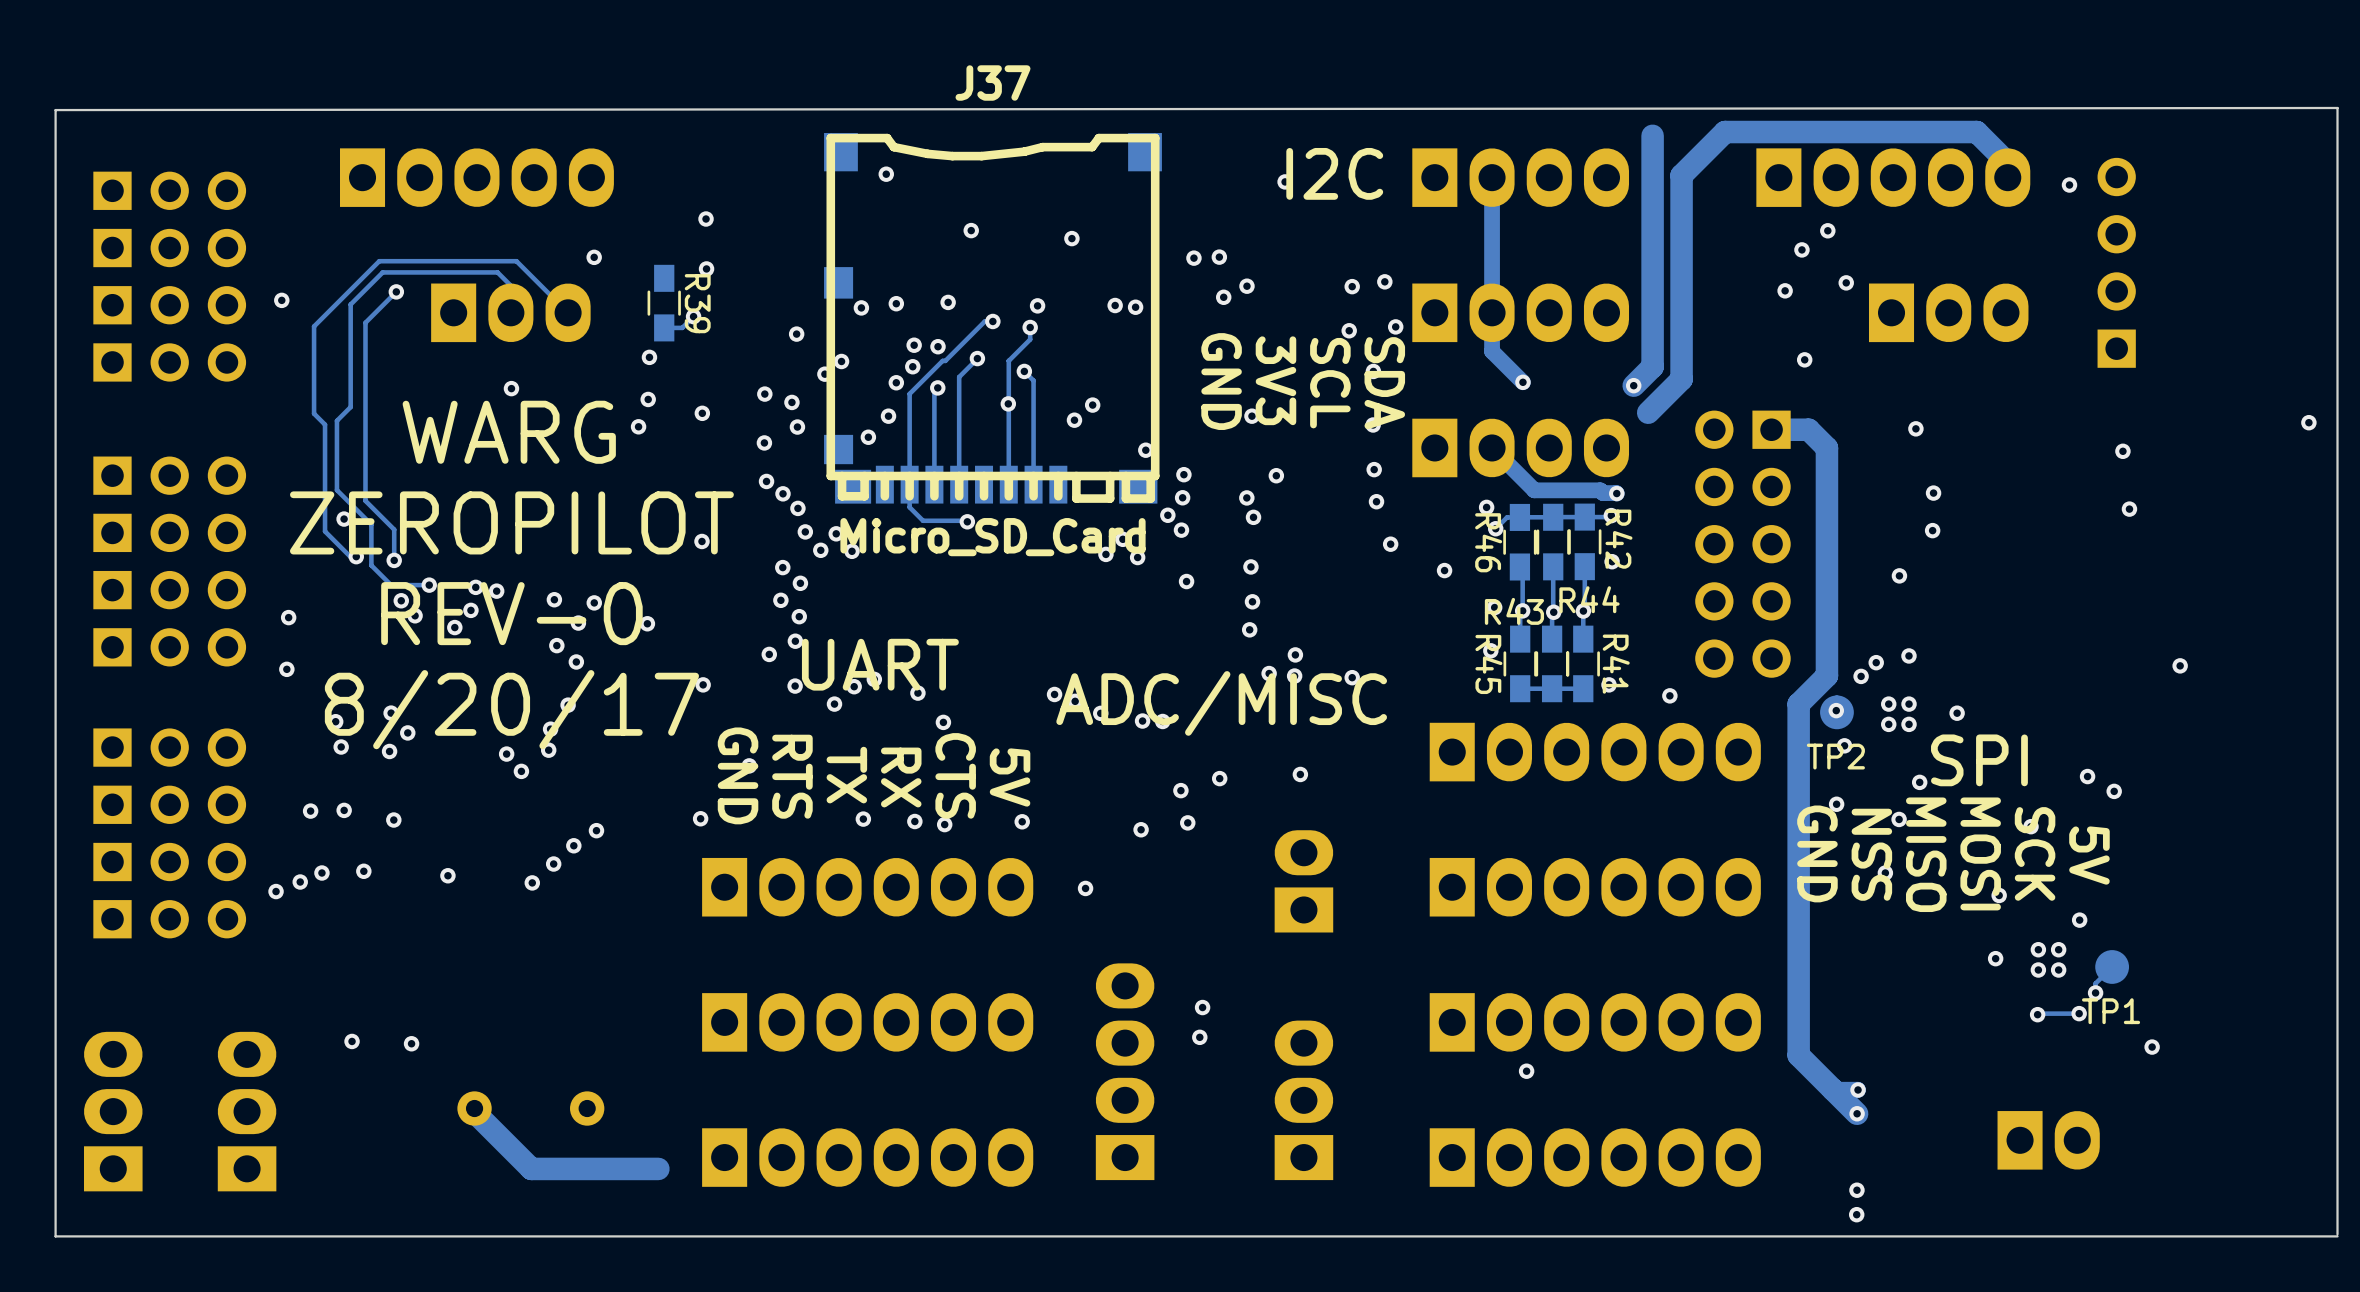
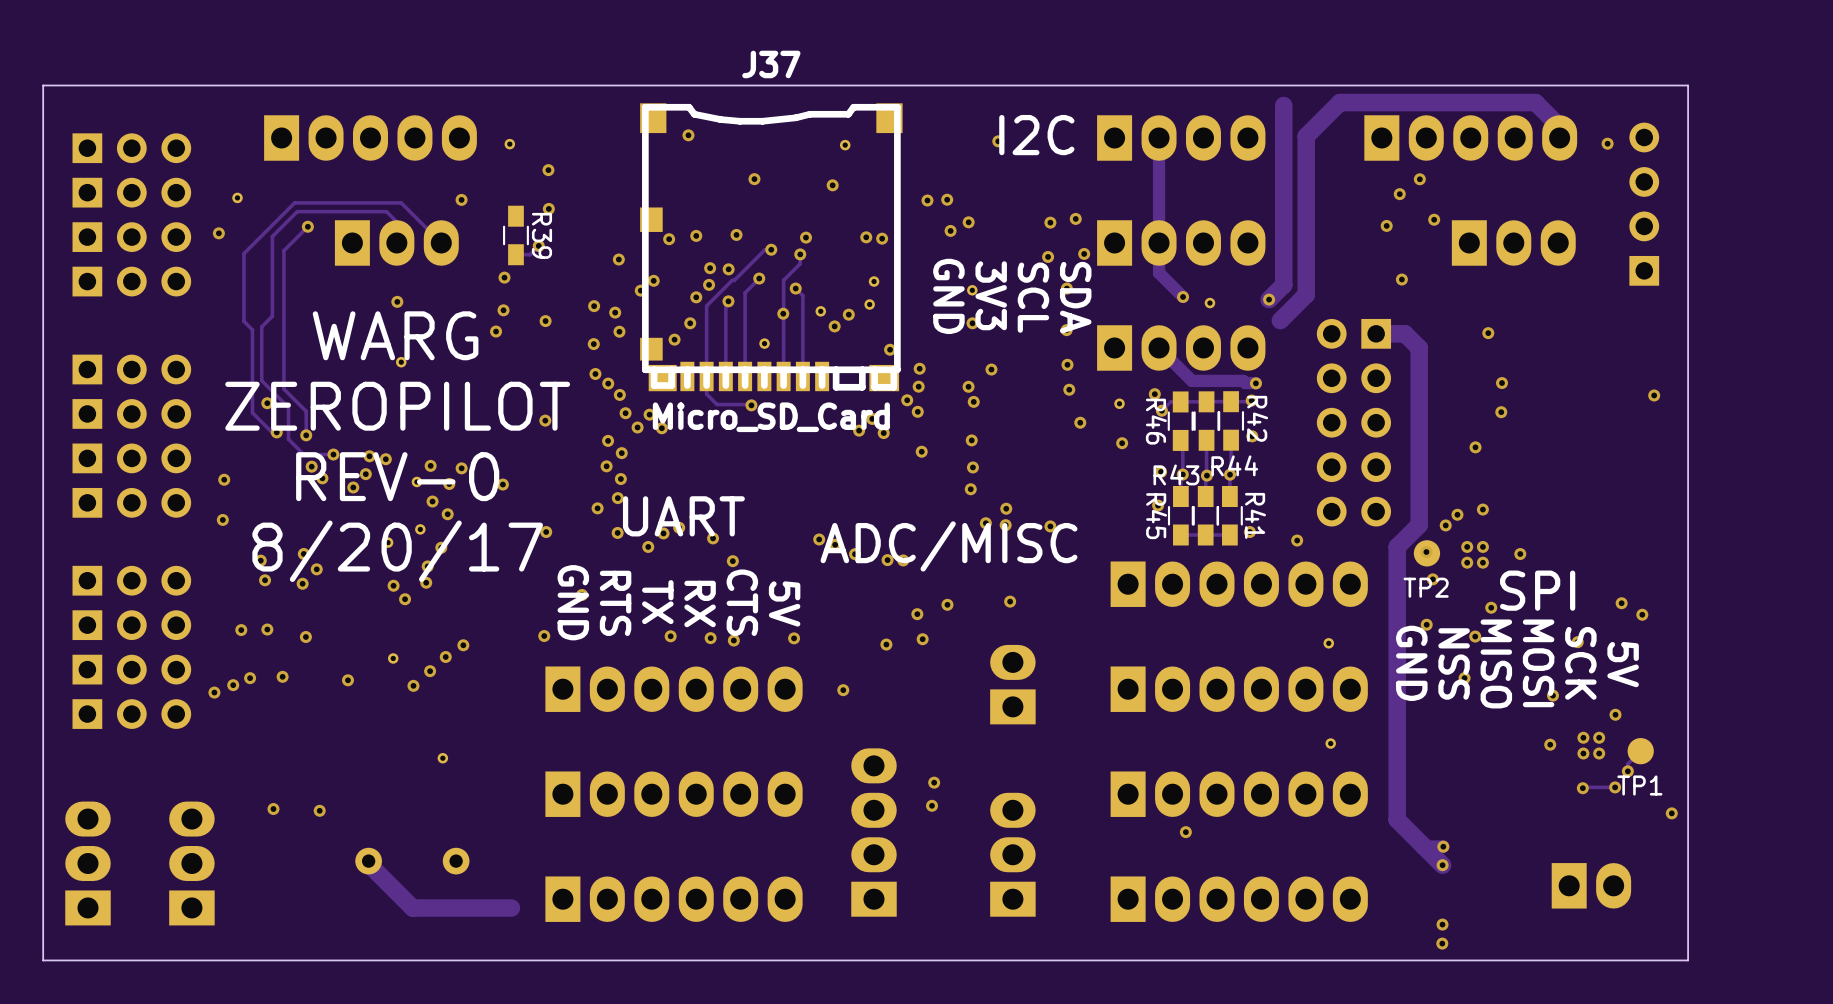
board edge: (55, 110) (2337, 107) (2337, 1234) -> (43, 85) (1688, 85) (1688, 960)
part: none -> (509, 144)
part: none -> (845, 145)
part: none -> (237, 197)
part: none -> (874, 281)
part: none -> (972, 290)
part: none -> (1209, 303)
part: none -> (869, 304)
part: none -> (820, 311)
via: (2308, 422) -> none
part: none -> (764, 343)
via: (2122, 451) -> none
part: none -> (401, 362)
part: none -> (1119, 403)
part: none -> (416, 481)
via: (2180, 665) -> none
part: none -> (420, 529)
part: none -> (388, 542)
part: none -> (1328, 643)
part: none -> (393, 658)
part: none -> (1330, 743)
part: none -> (442, 758)
board edge: (2337, 1236) (2173, 1236) -> none

